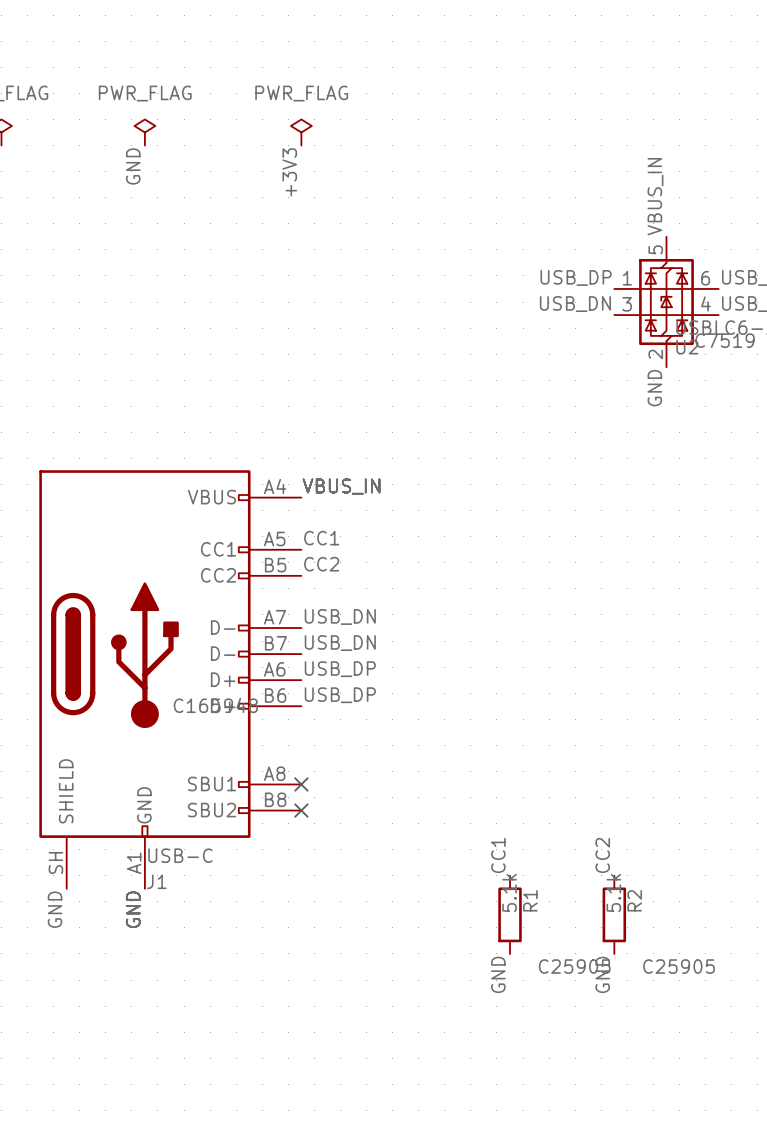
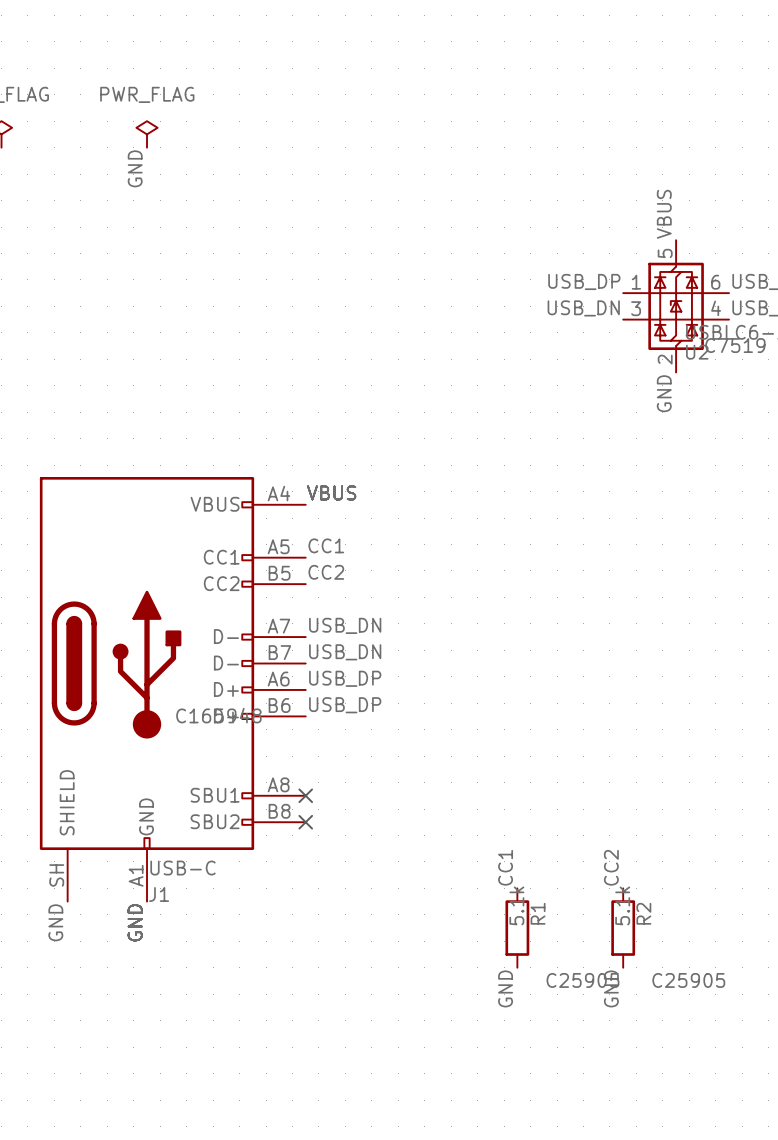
power symbol: PWR_FLAG (301, 132) -> none
label: +3V3 (289, 172) -> none
label: VBUS_IN (655, 196) -> VBUS (664, 214)
label: VBUS_IN (341, 486) -> VBUS (331, 492)

